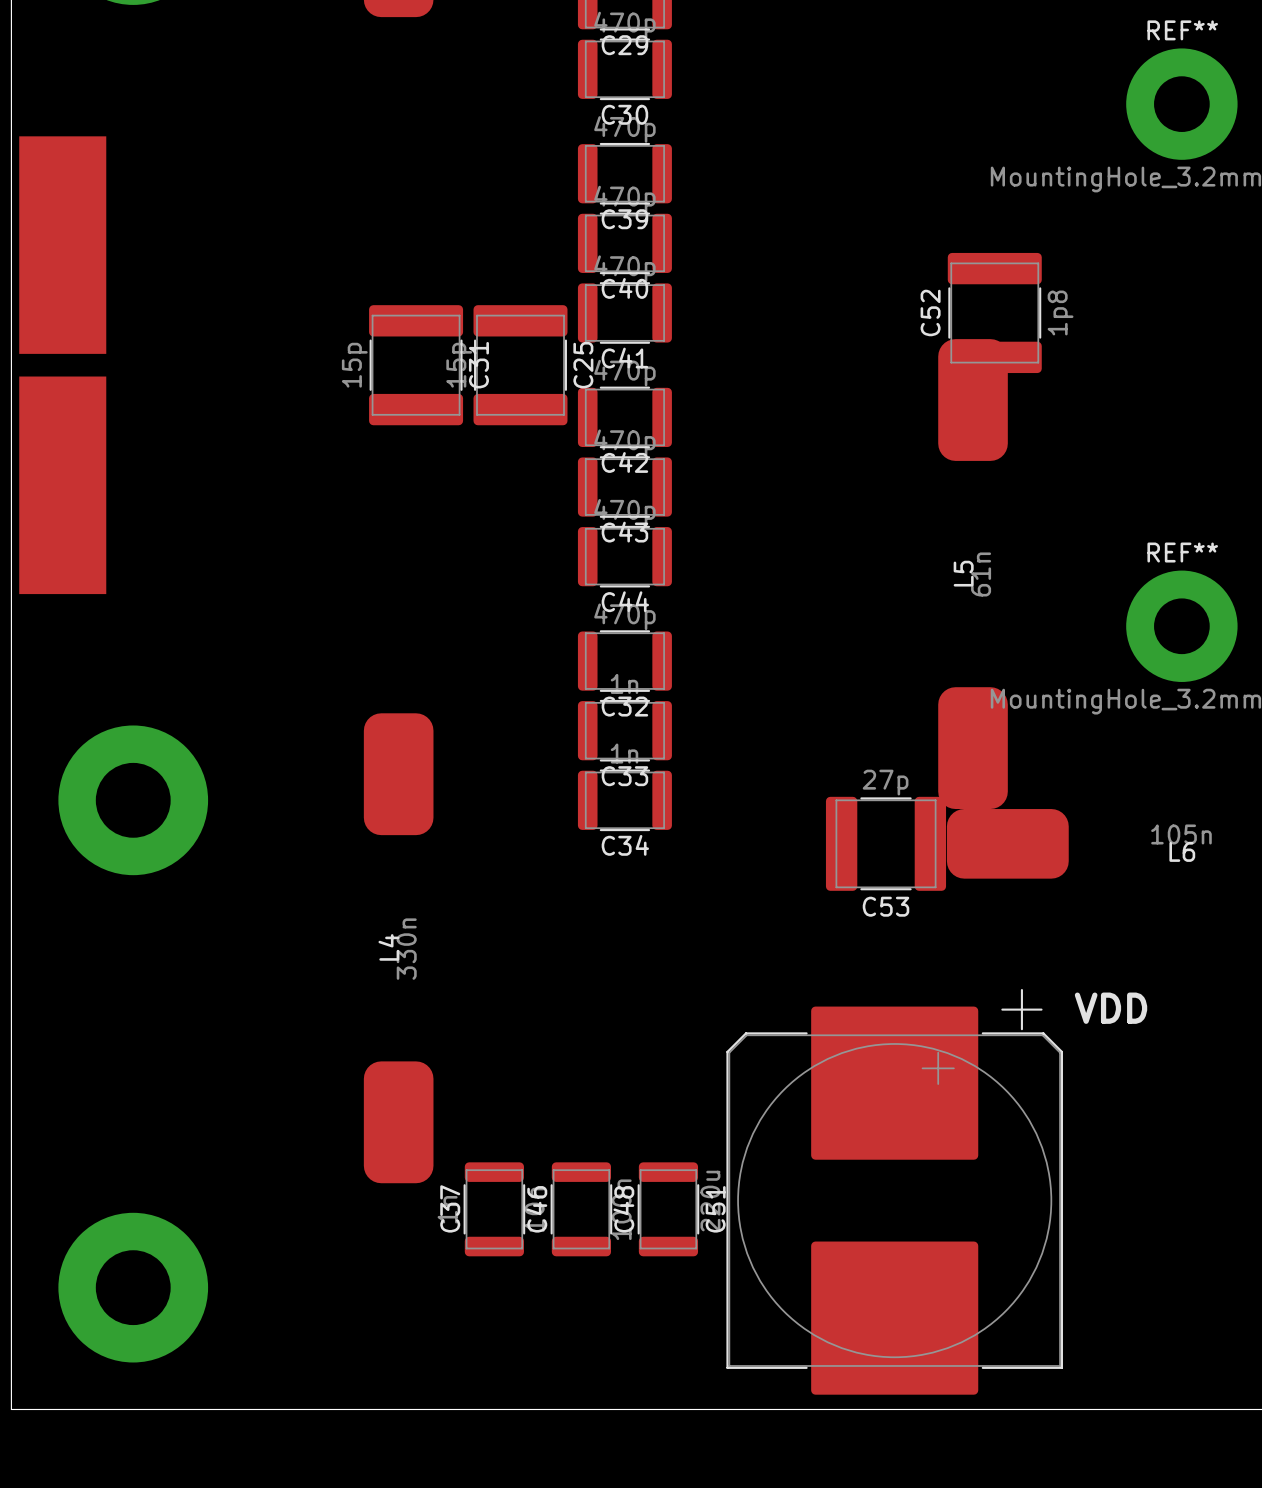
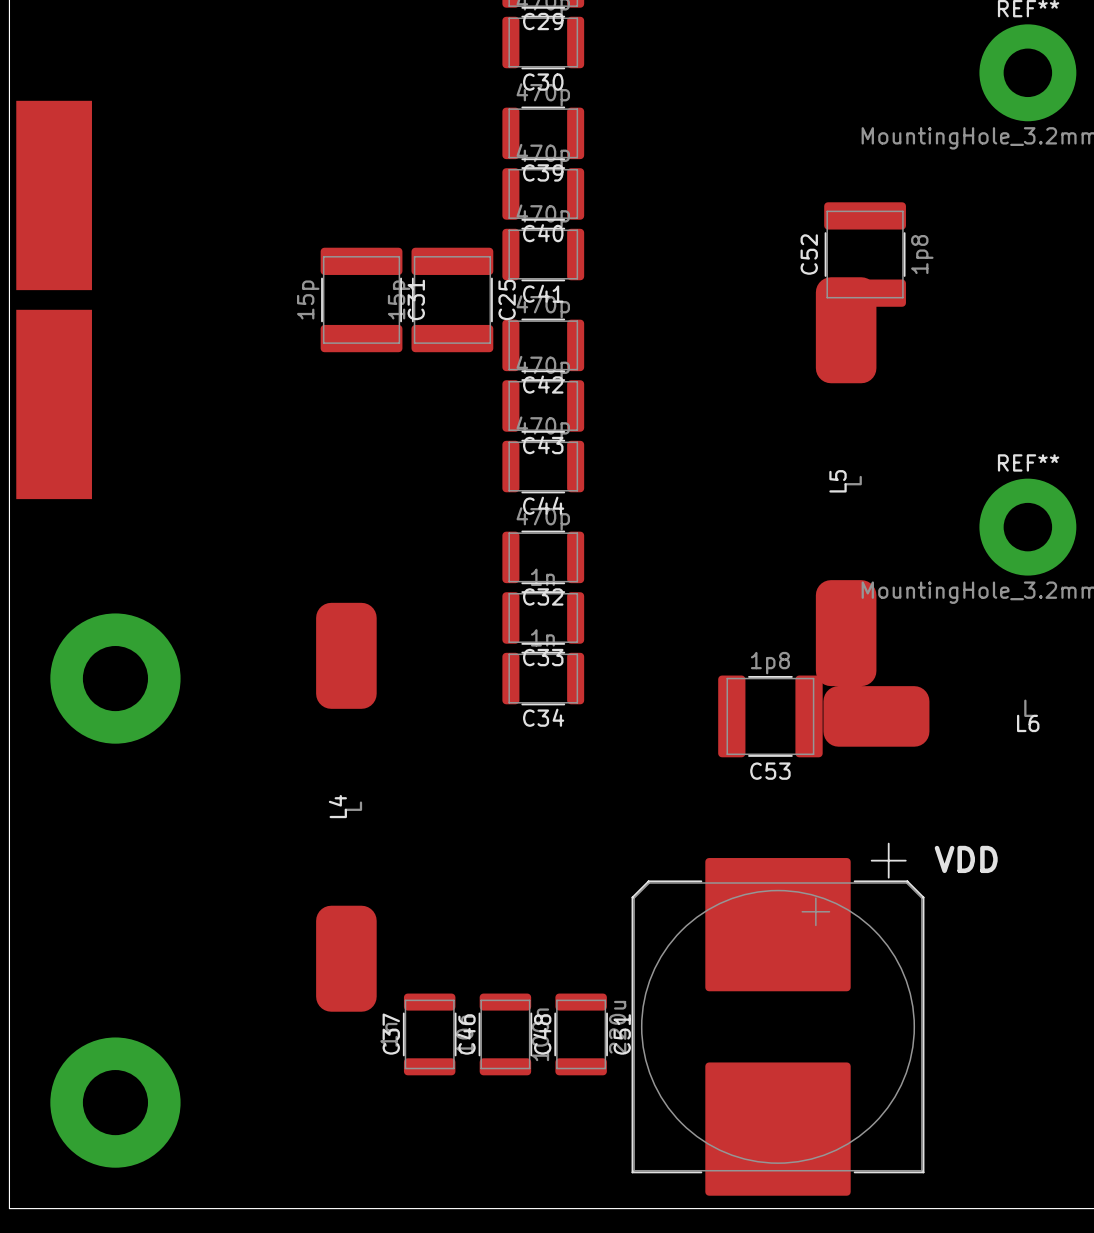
L5 value: 61n (981, 574) -> L (853, 480)
C53 value: 27p (885, 782) -> 1p8 (770, 663)
L6 value: 105n (1181, 834) -> L (1028, 708)
L4 value: 330n (406, 949) -> L (353, 806)

